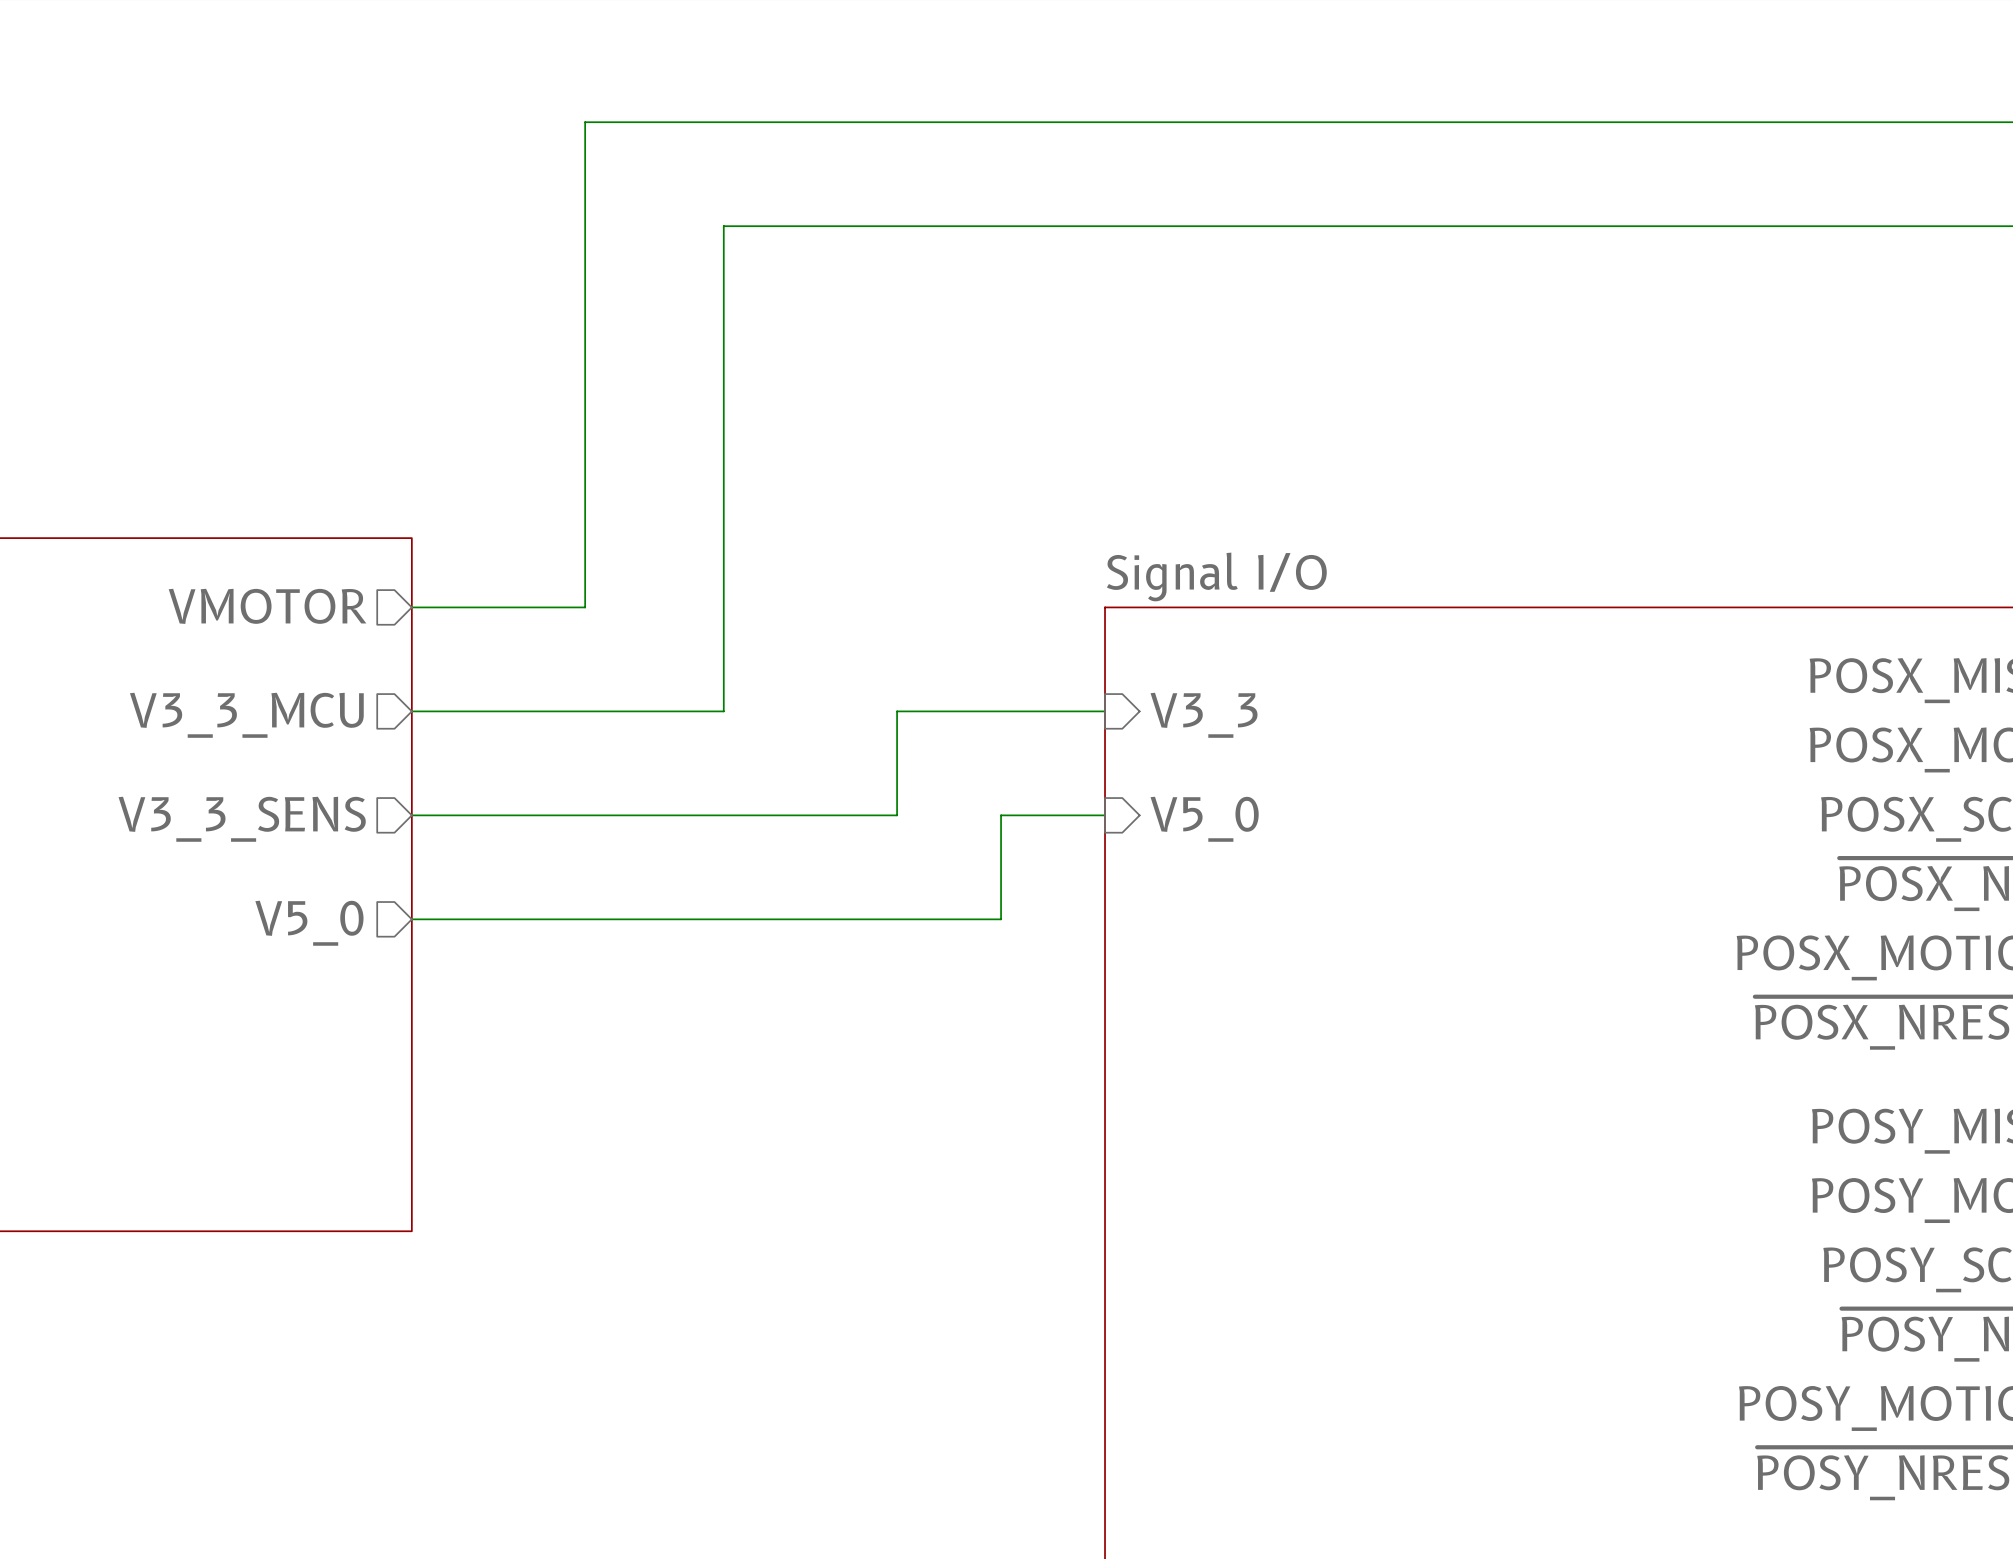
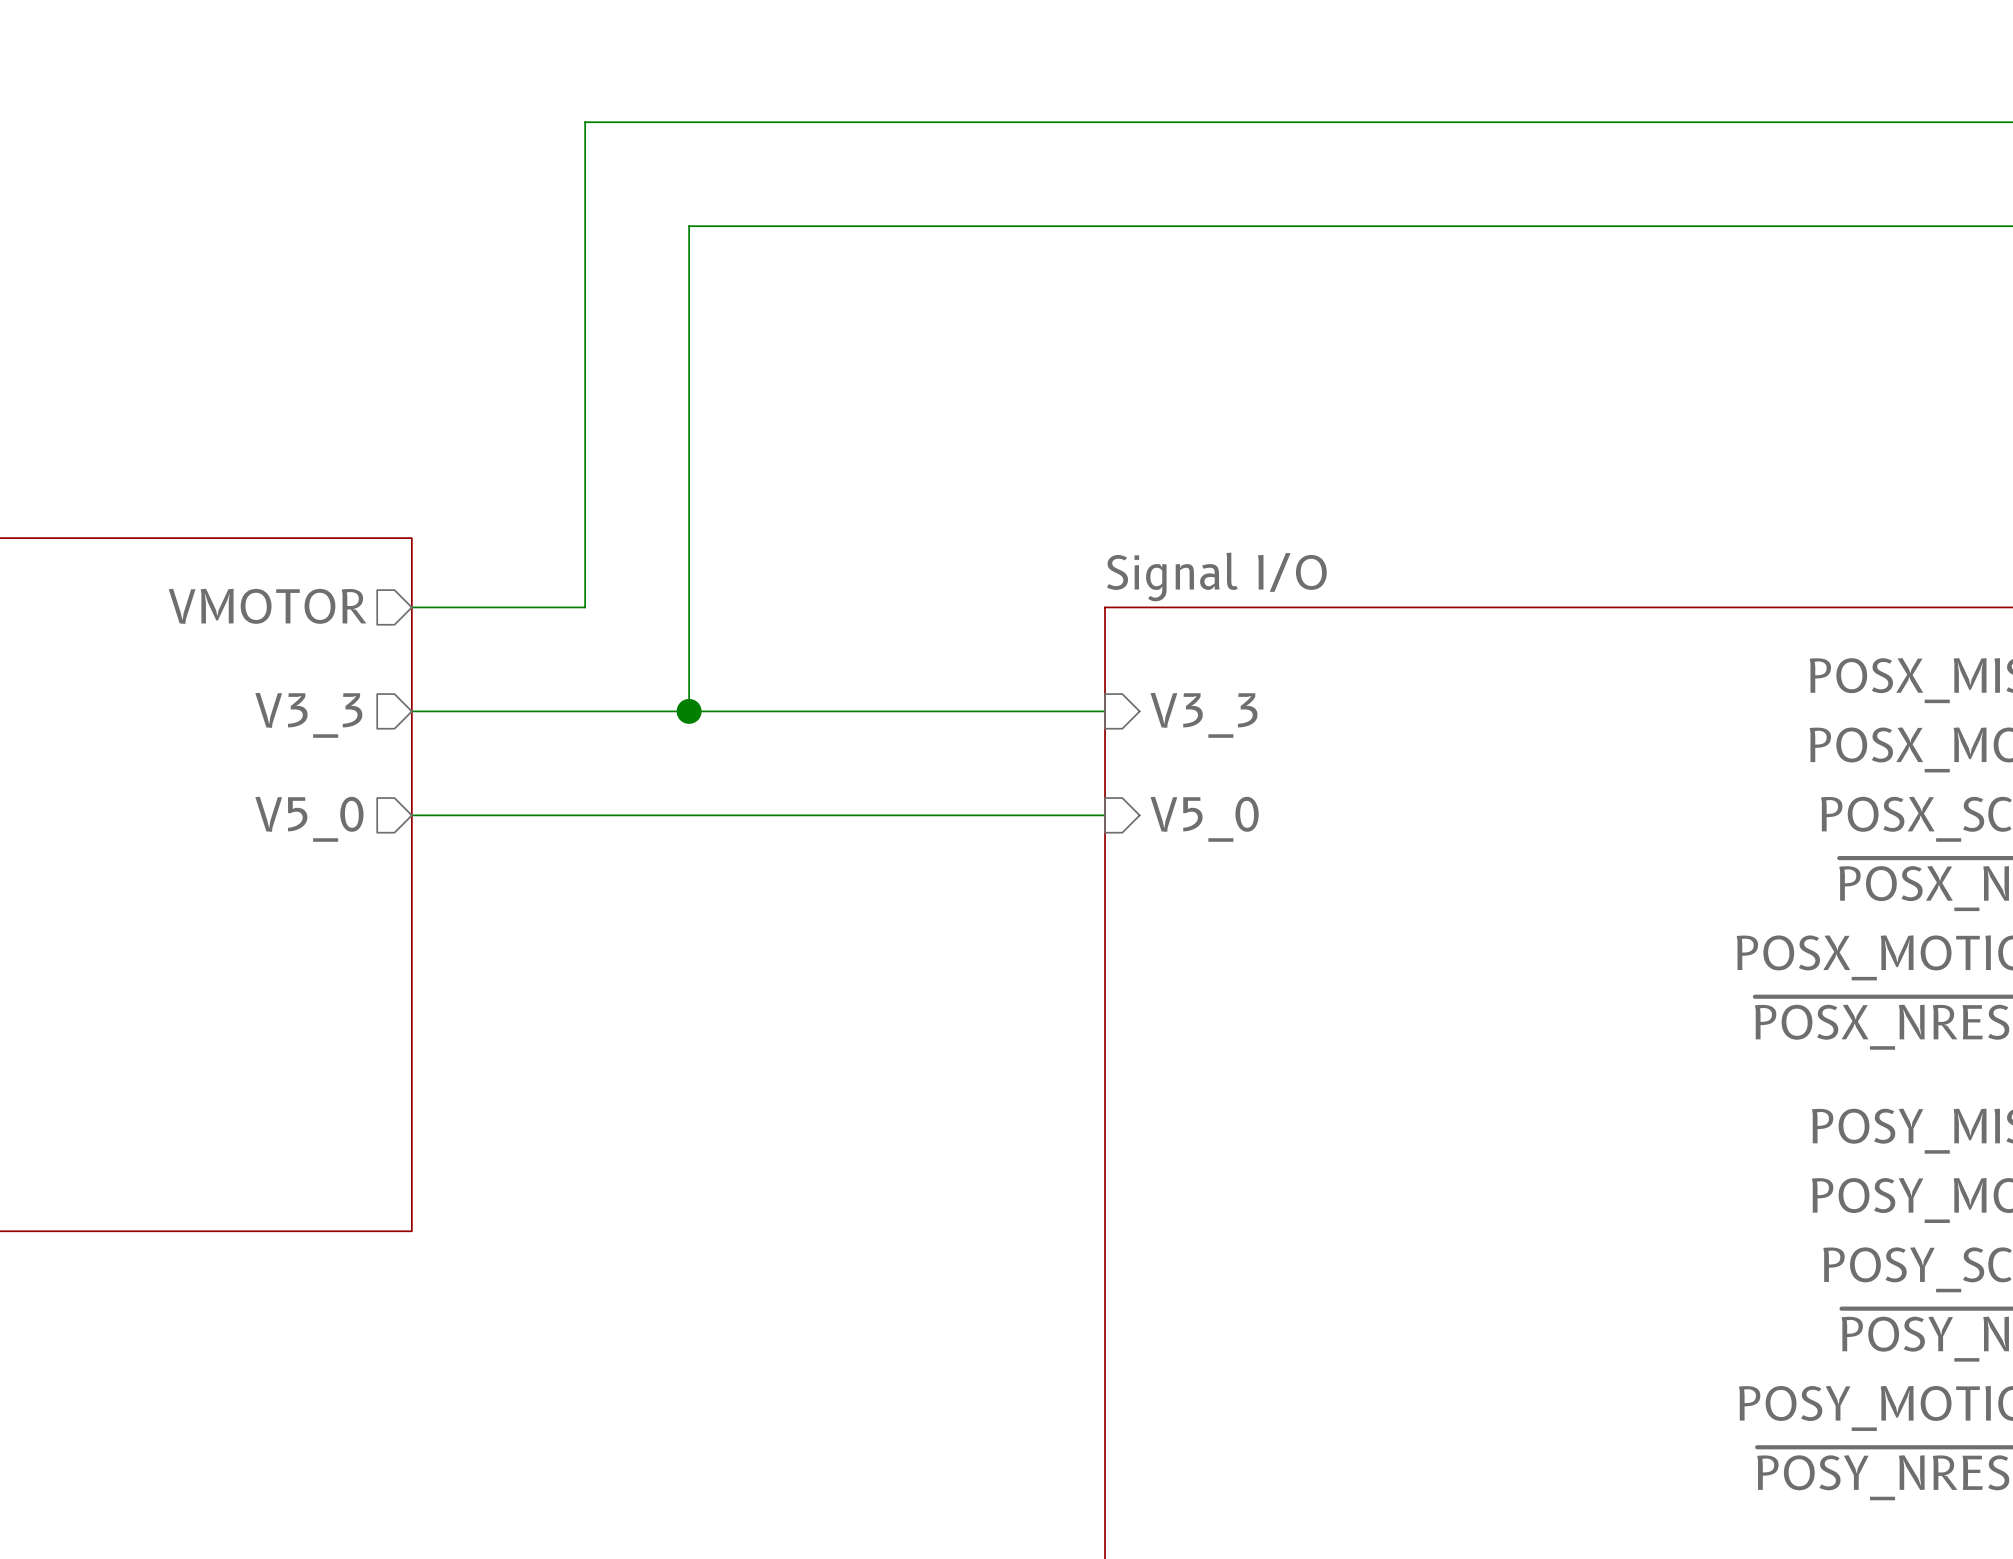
wire: (723, 226) (723, 711) -> (723, 226) (689, 226) (689, 711)
junction: none -> (689, 711)
wire: none -> (723, 711) (897, 711)
wire: (897, 711) (897, 815) -> (1001, 815) (897, 815)
sheet pin: V3_3_MCU (246, 715) -> V3_3 (308, 715)
wire: (1001, 815) (1001, 919) (411, 919) -> none
sheet pin: V3_3_SENS (242, 819) -> V5_0 (309, 819)
sheet pin: V5_0 (309, 923) -> none

